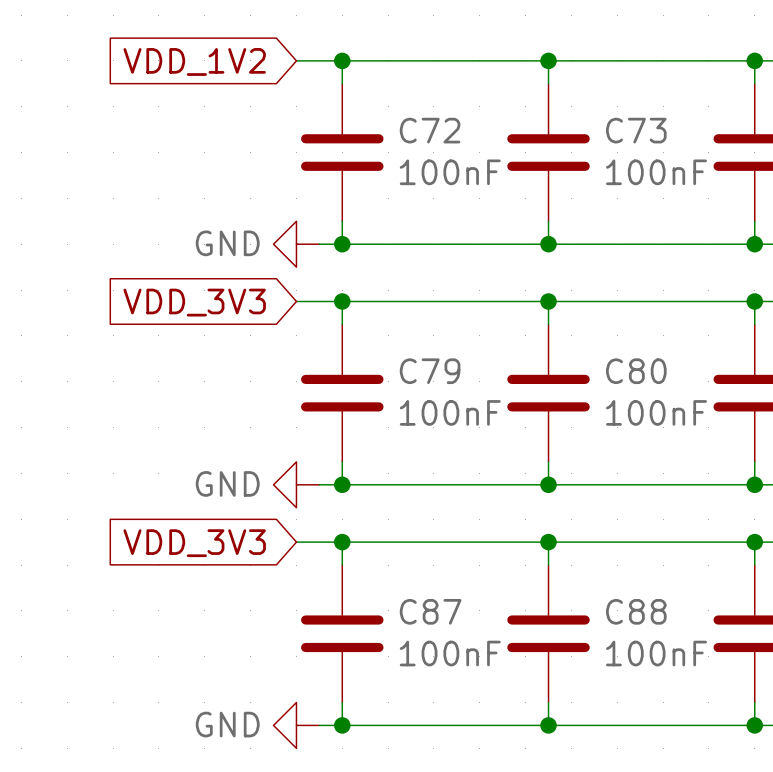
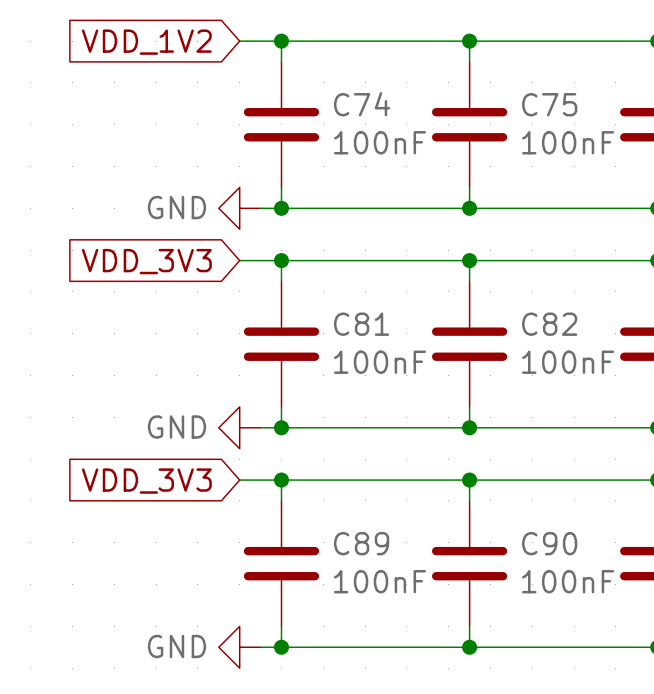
C72 name: C72 (430, 130) -> C74 (362, 104)
C73 name: C73 (636, 130) -> C75 (549, 104)
C79 name: C79 (430, 371) -> C81 (361, 324)
C80 name: C80 (636, 371) -> C82 (549, 324)
C87 name: C87 (430, 611) -> C89 (361, 543)
C88 name: C88 (636, 611) -> C90 (549, 543)

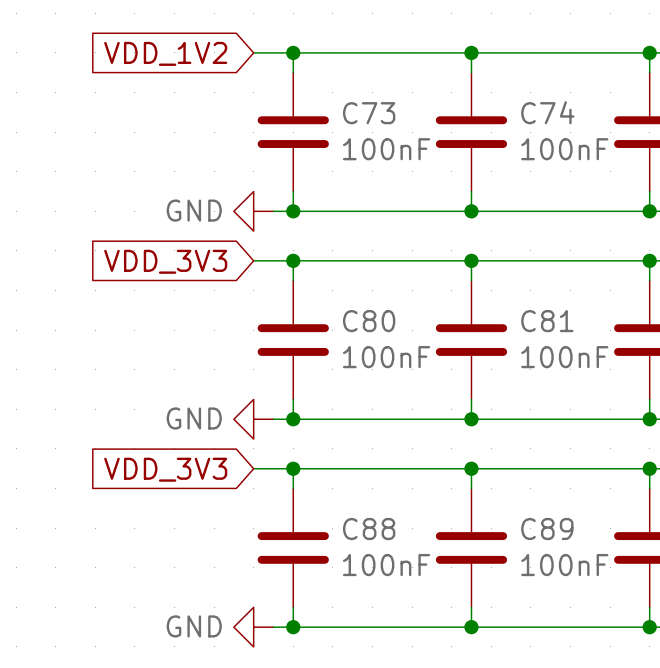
C74 name: C74 (362, 104) -> C73 (369, 113)
C75 name: C75 (549, 104) -> C74 (547, 112)
C81 name: C81 (361, 324) -> C80 (369, 321)
C82 name: C82 (549, 324) -> C81 (547, 321)
C89 name: C89 (361, 543) -> C88 (369, 529)
C90 name: C90 (549, 543) -> C89 (547, 529)

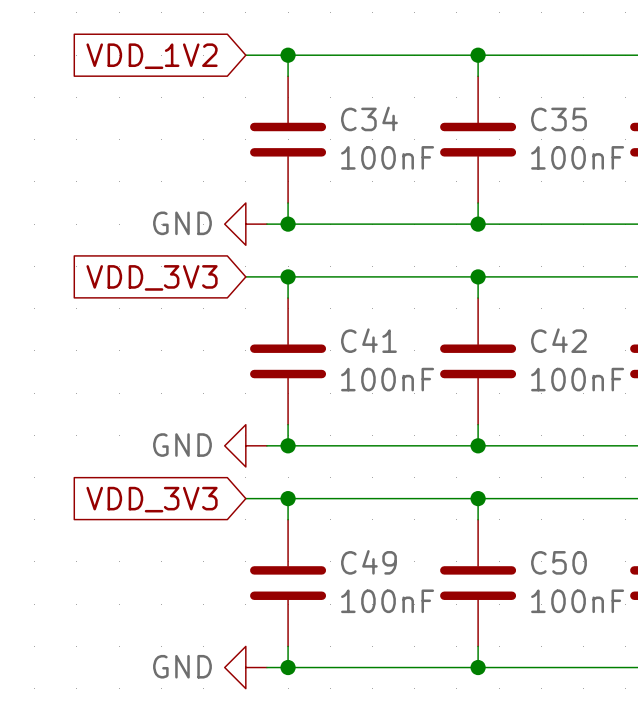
C74 name: C74 (547, 112) -> C35 (558, 119)
C73 name: C73 (369, 113) -> C34 (369, 118)
C80 name: C80 (369, 321) -> C41 (368, 340)
C81 name: C81 (547, 321) -> C42 (558, 340)
C88 name: C88 (369, 529) -> C49 (368, 562)
C89 name: C89 (547, 529) -> C50 (558, 562)

